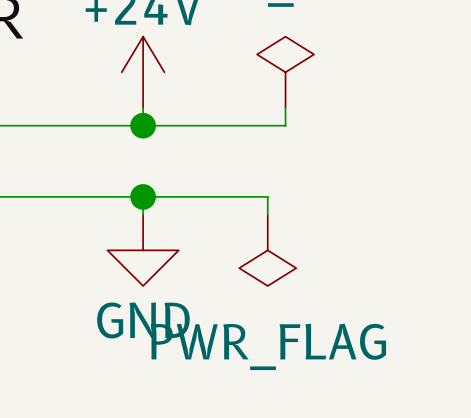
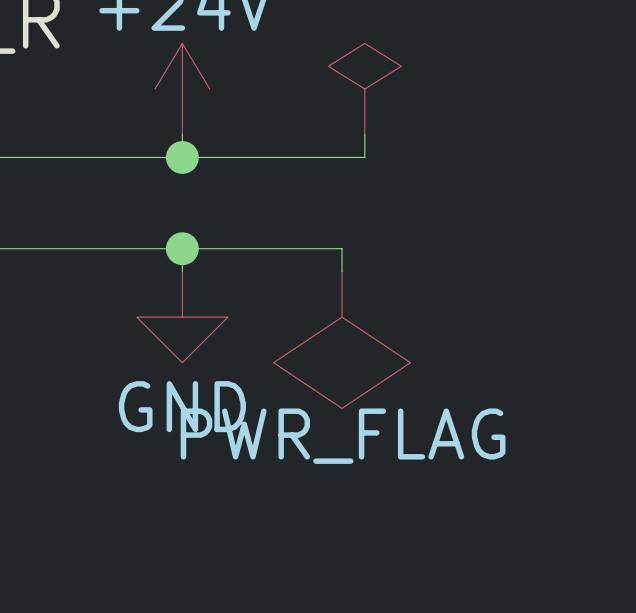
power symbol shape: [239, 214, 297, 286] -> [273, 271, 411, 409]

